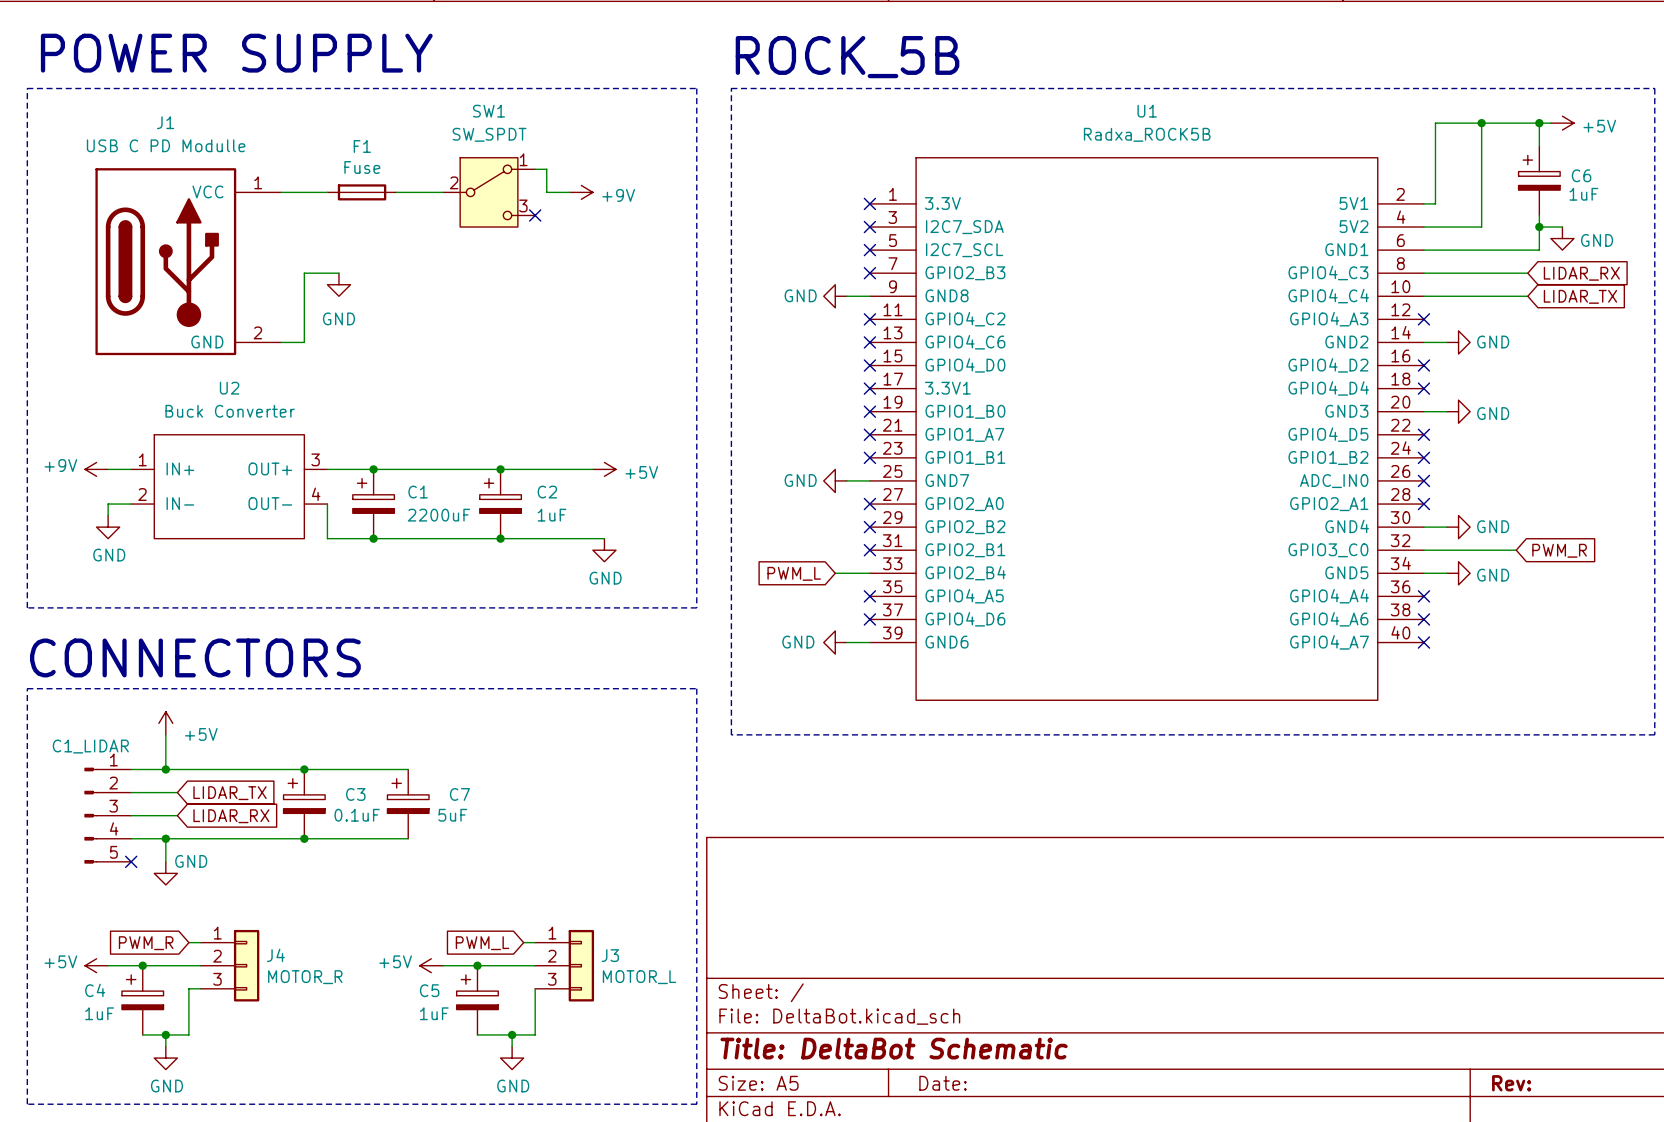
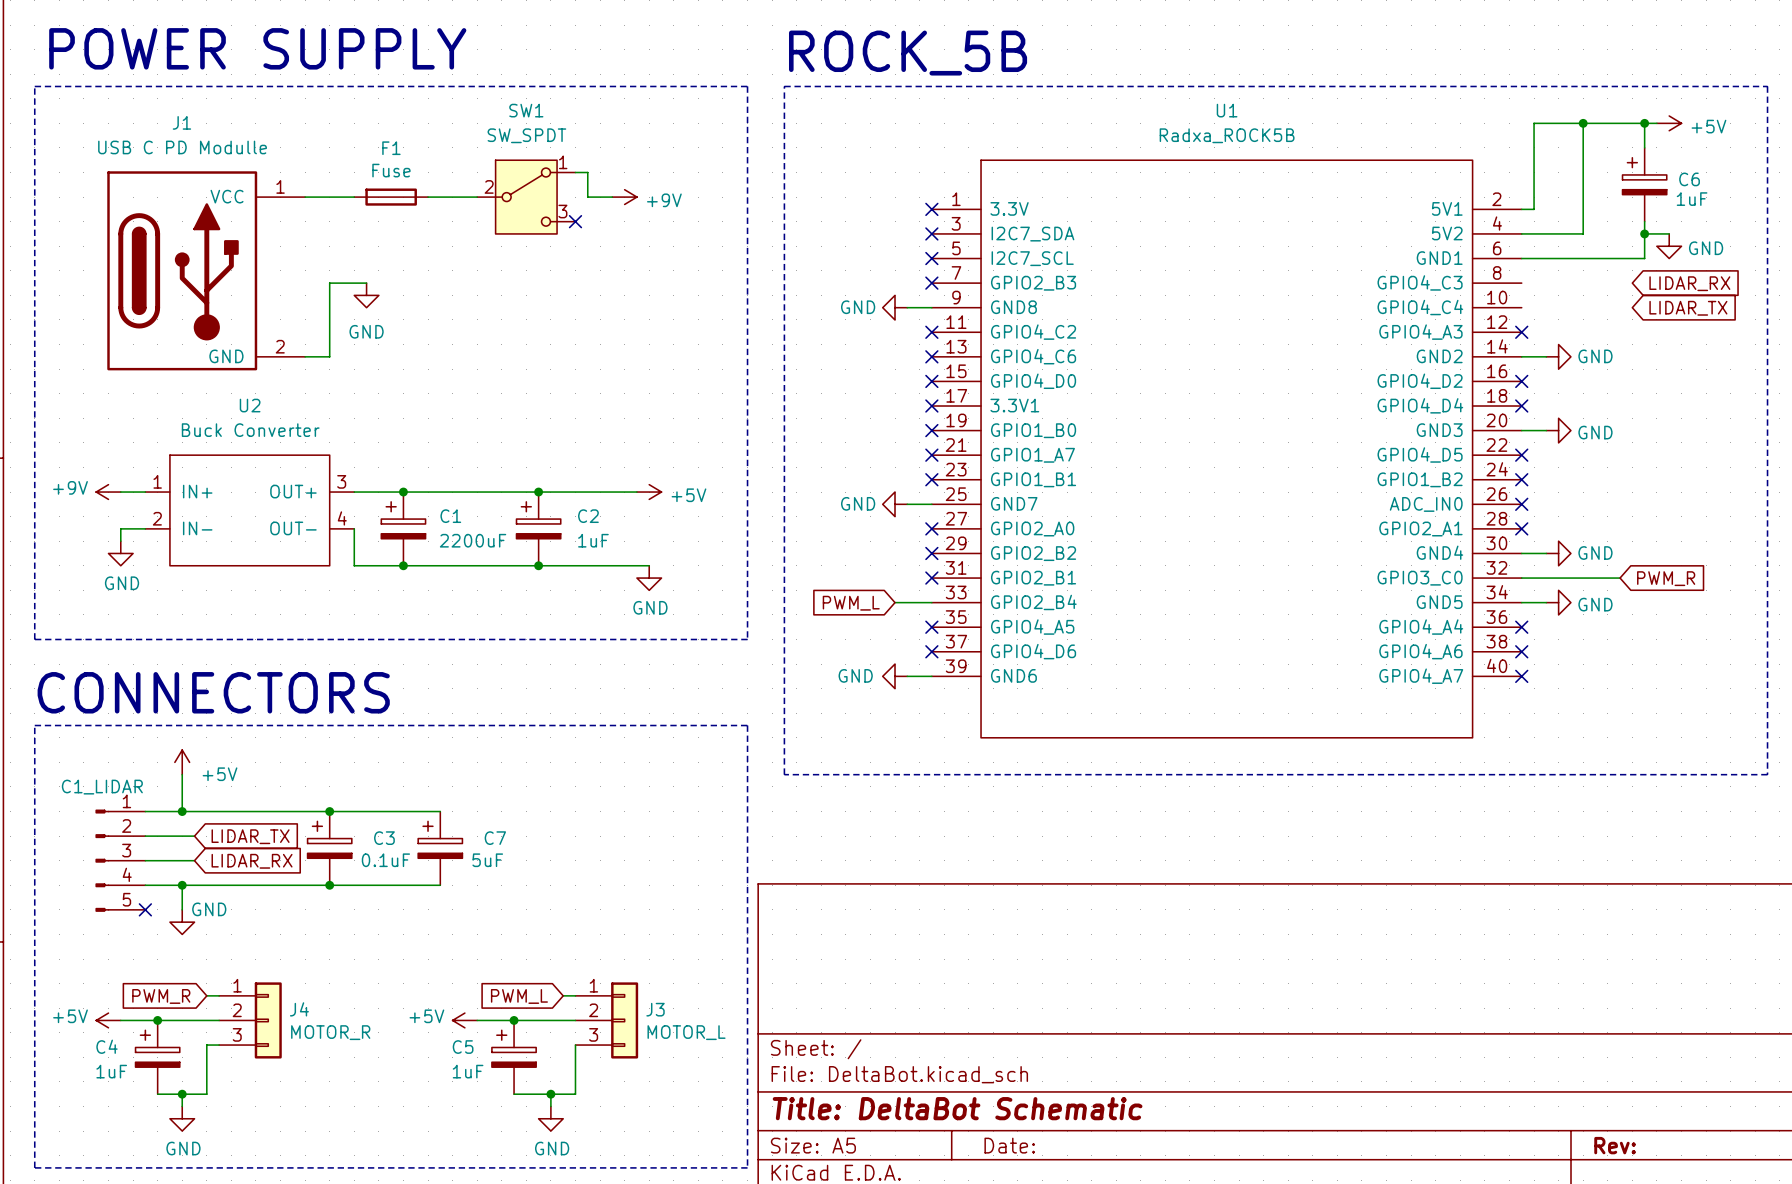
wire: (1423, 273) (1527, 273) -> none
wire: (1423, 296) (1527, 296) -> none

